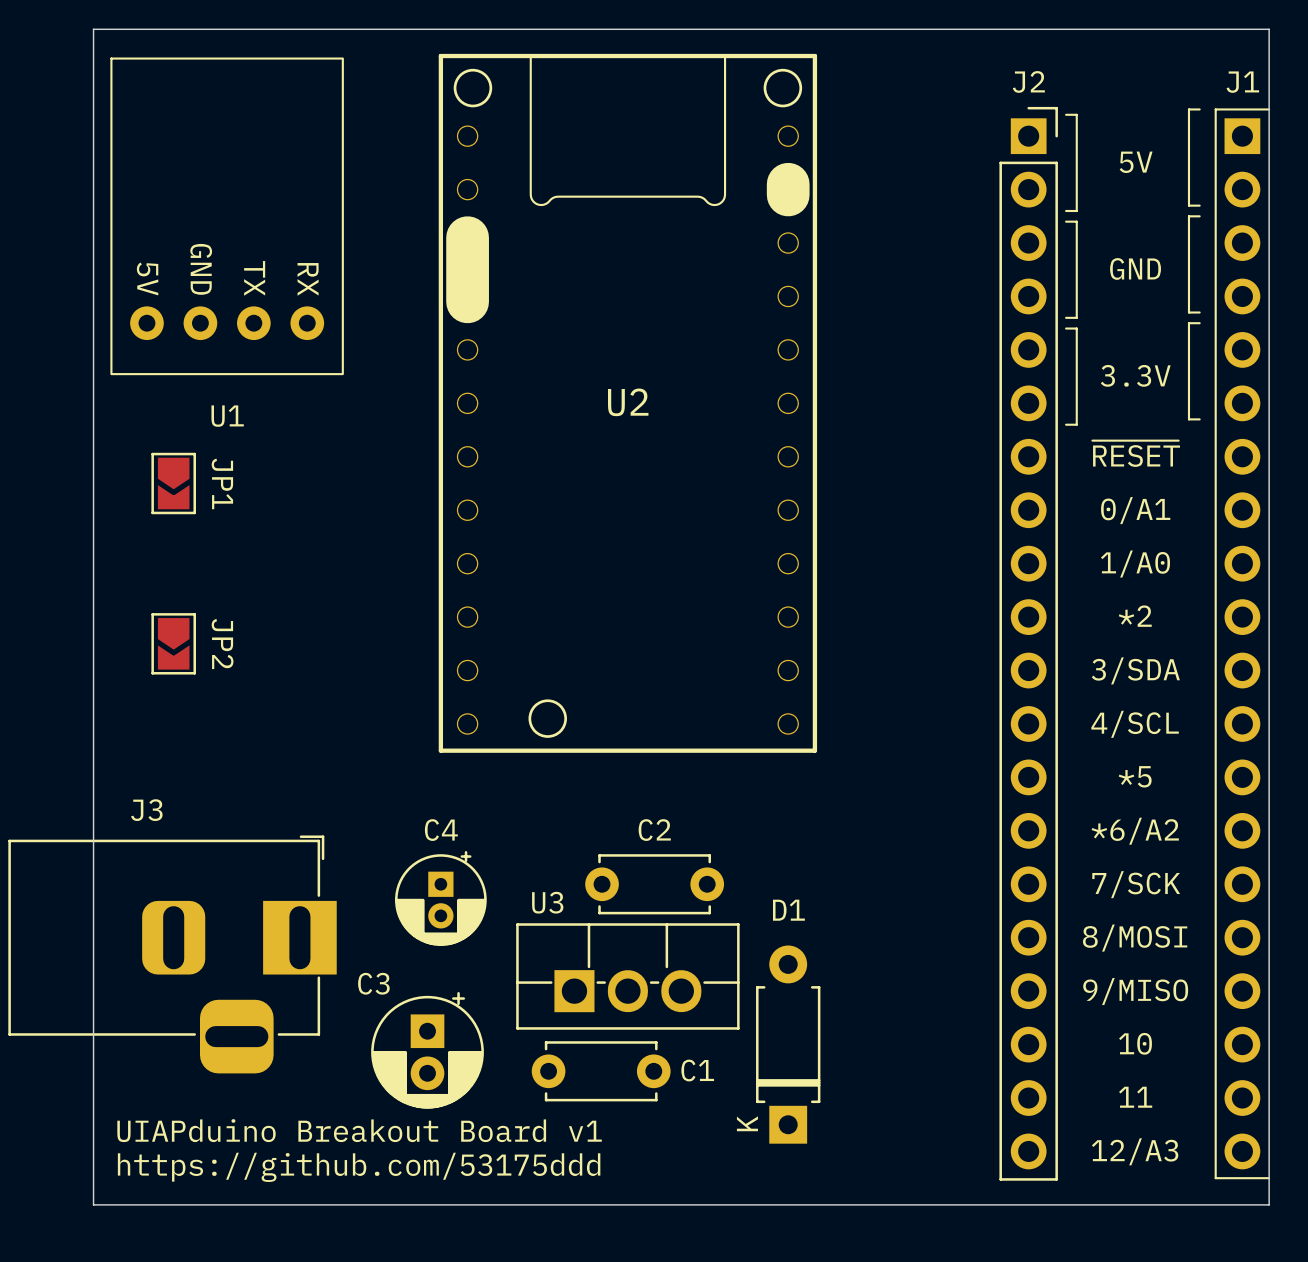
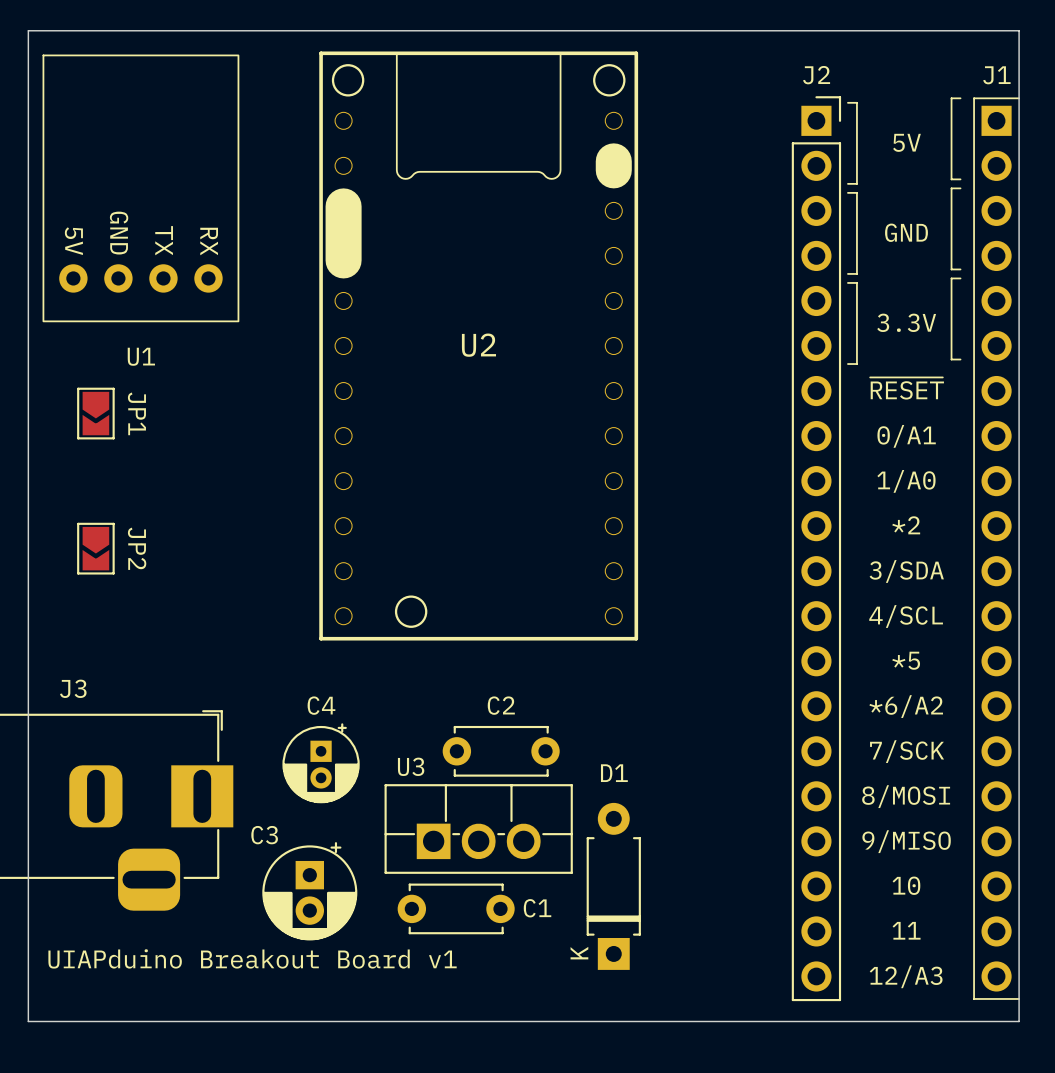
text: https://github.com/53175ddd (359, 1167) -> none

